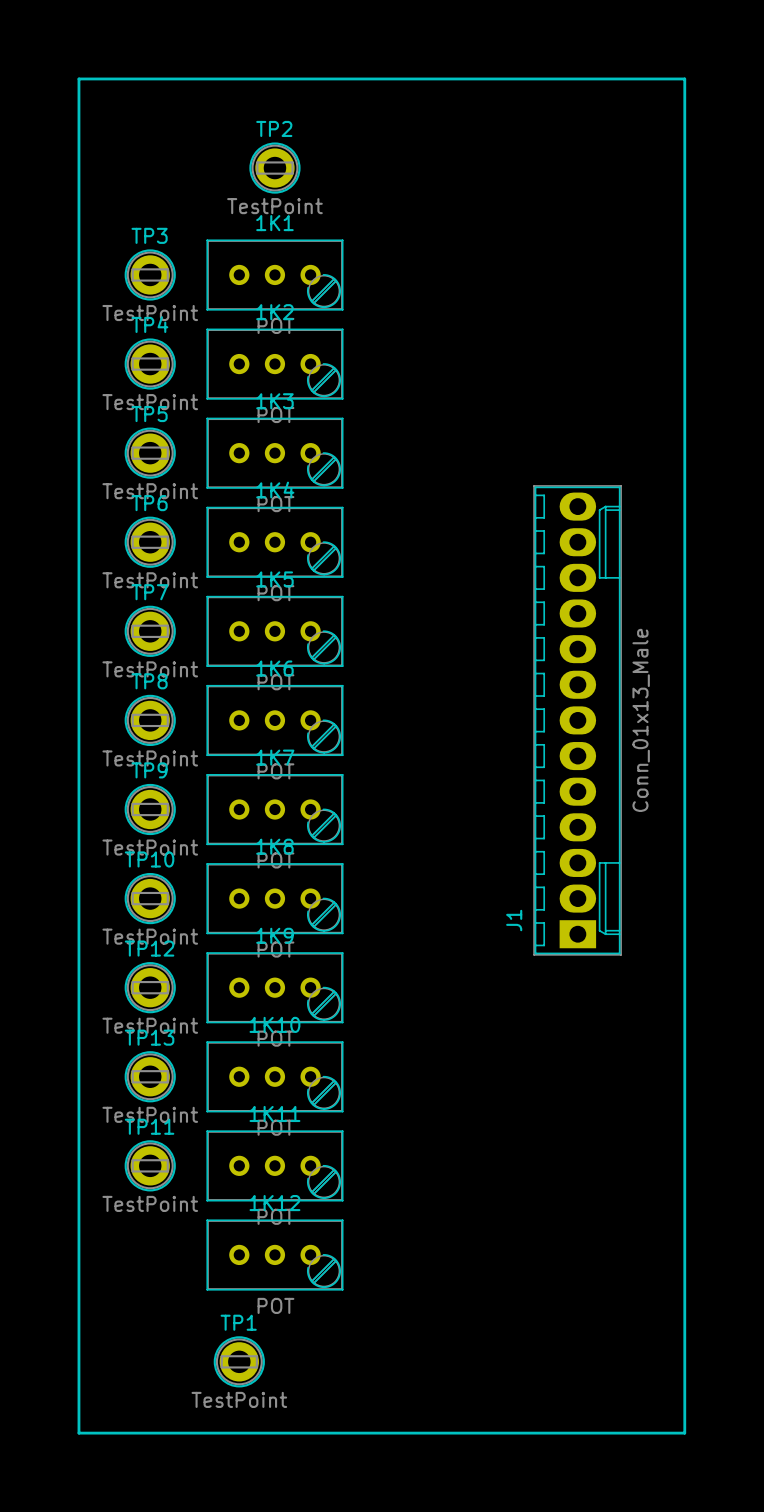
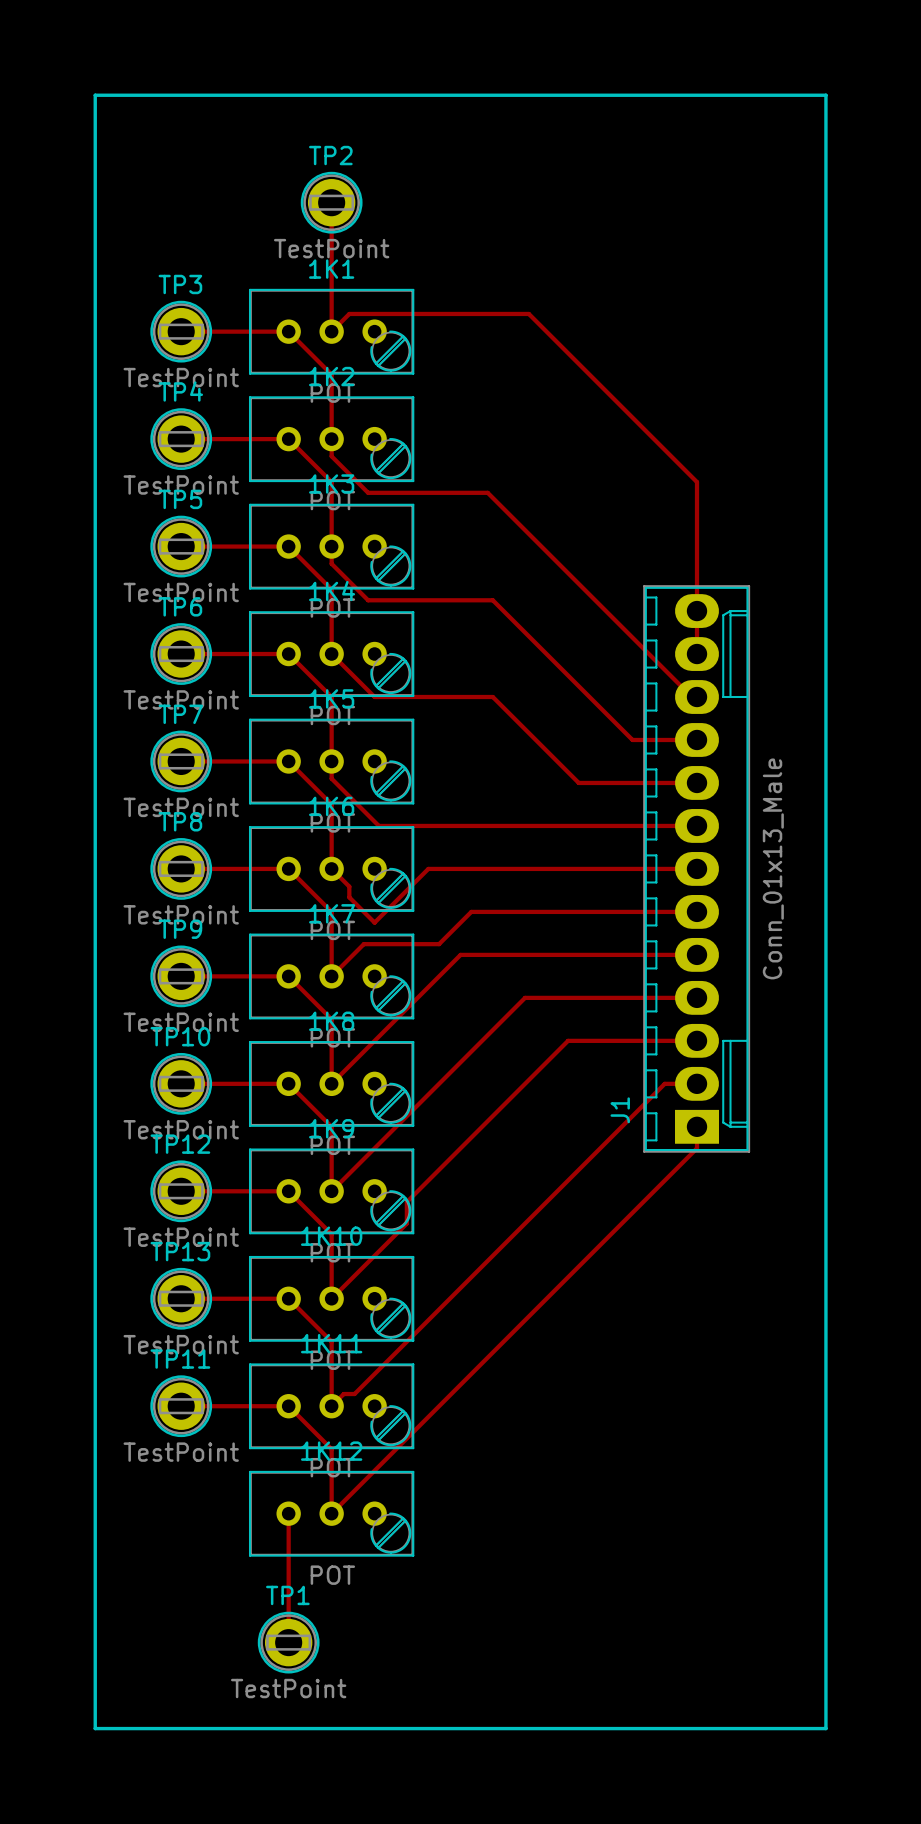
top track: none -> (331, 202) (331, 331) (349, 313) (528, 313) (697, 482) (697, 654)
top track: none -> (181, 331) (288, 331) (331, 374) (331, 456) (368, 492) (487, 492) (691, 697) (697, 697)
top track: none -> (181, 439) (288, 439) (331, 482) (331, 563) (368, 600) (492, 600) (632, 739) (697, 739)
top track: none -> (181, 546) (288, 546) (331, 589) (331, 654) (374, 697) (492, 697) (578, 782) (697, 782)
top track: none -> (181, 654) (288, 654) (331, 697) (331, 778) (378, 825) (697, 825)
top track: none -> (181, 761) (288, 761) (331, 804) (331, 868) (349, 886) (349, 897) (374, 922) (428, 868) (697, 868)
top track: none -> (181, 868) (288, 868) (331, 911) (331, 976) (363, 944) (439, 944) (471, 911) (697, 911)
top track: none -> (697, 954) (460, 954) (331, 1083) (331, 1019) (288, 976) (181, 976)
top track: none -> (697, 997) (525, 997) (331, 1191) (331, 1126) (288, 1083) (181, 1083)
top track: none -> (697, 1040) (568, 1040) (406, 1202) (406, 1223) (331, 1298) (331, 1234) (288, 1191) (181, 1191)
top track: none -> (697, 1083) (664, 1083) (354, 1394) (343, 1394) (331, 1406) (331, 1341) (288, 1298) (181, 1298)
top track: none -> (697, 1126) (697, 1148) (331, 1513) (331, 1449) (288, 1406) (181, 1406)
top track: none -> (288, 1513) (288, 1642)

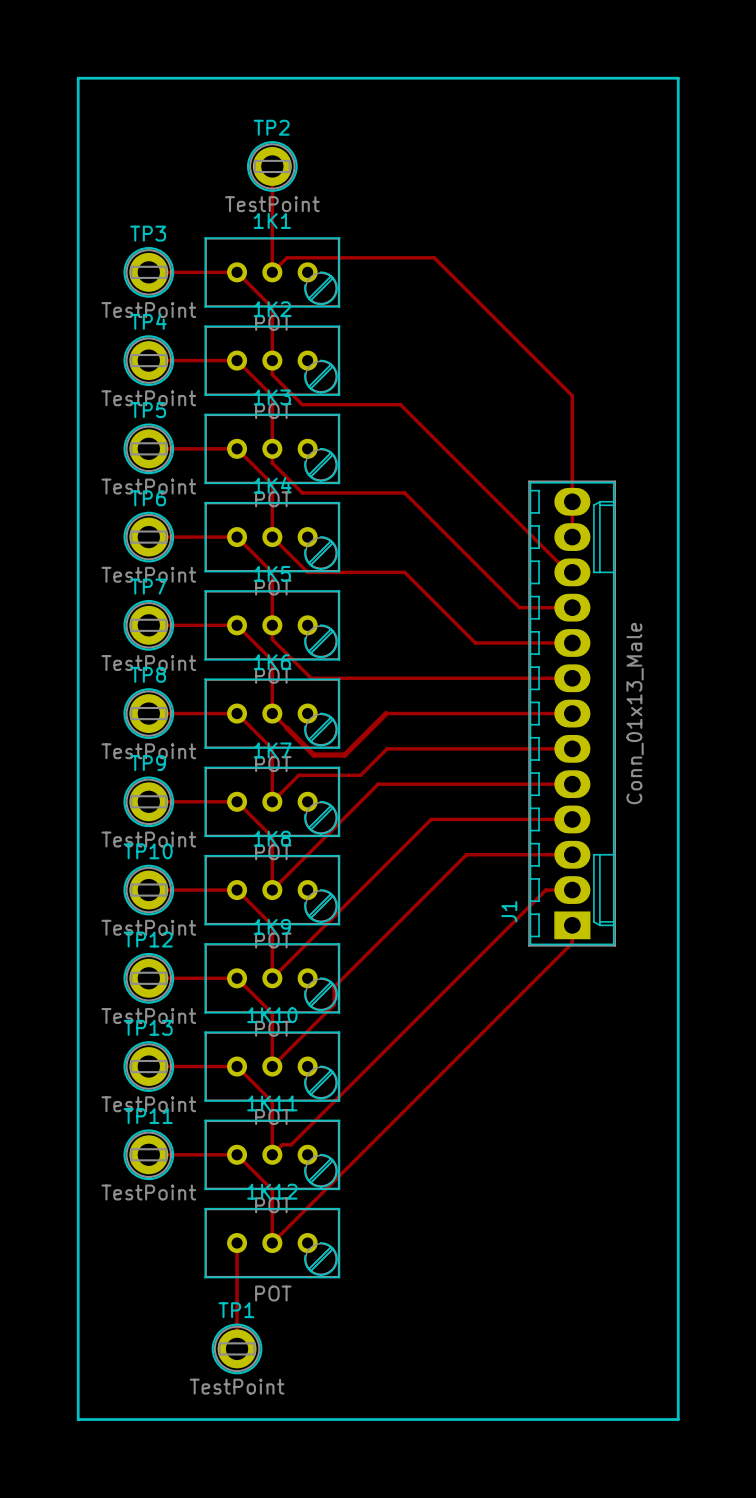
top track: (470, 868) (428, 868) (374, 922) (349, 897) (349, 886) -> (386, 713) (344, 755) (313, 755) (286, 728)

